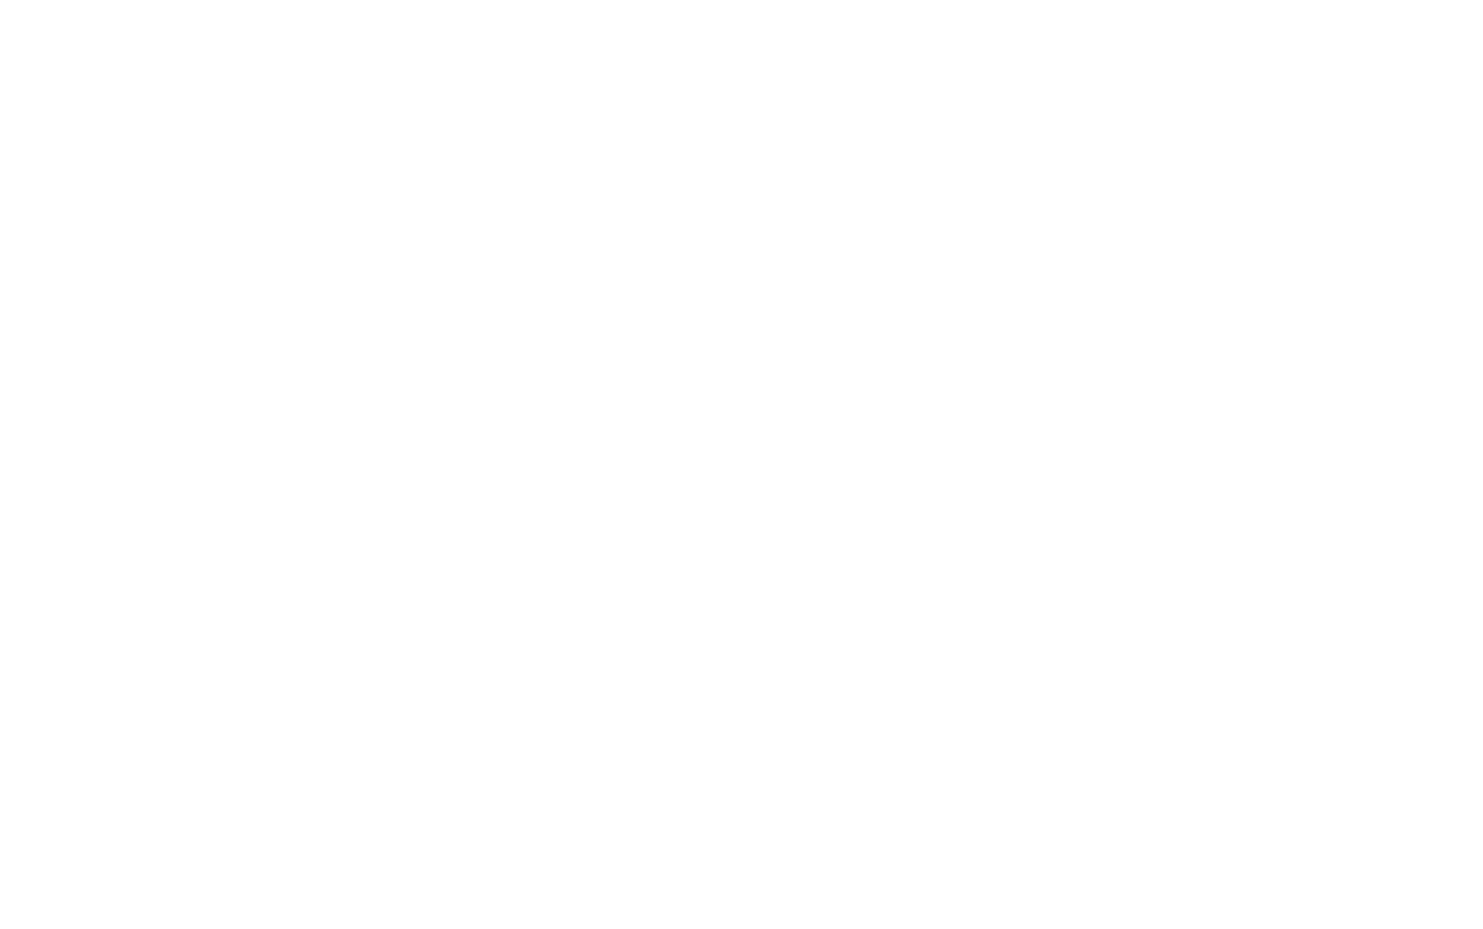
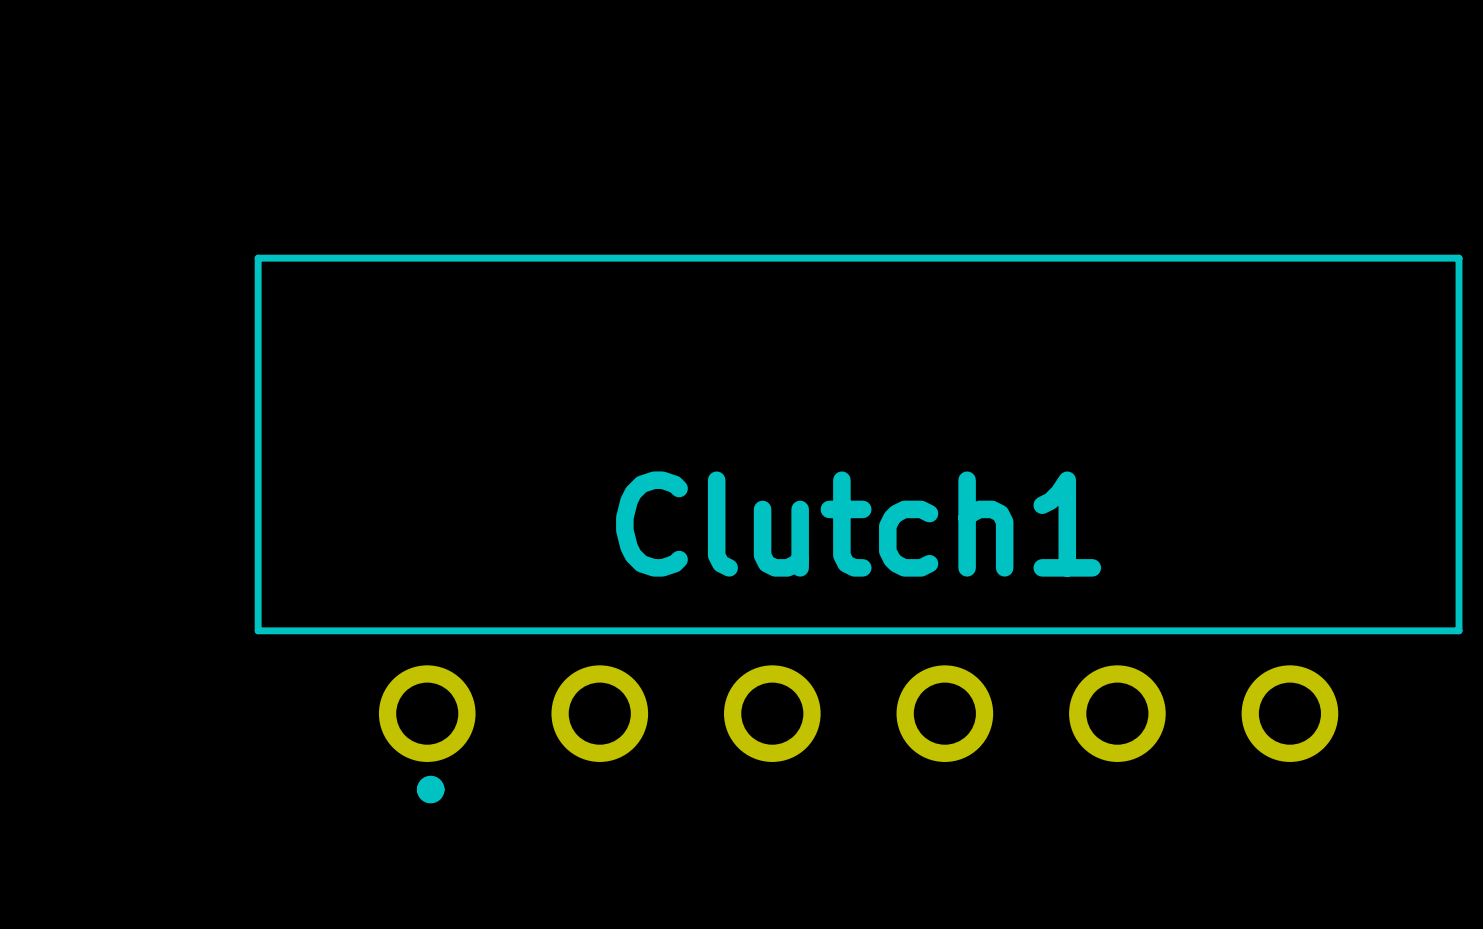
Clutch1: none -> (858, 529)

